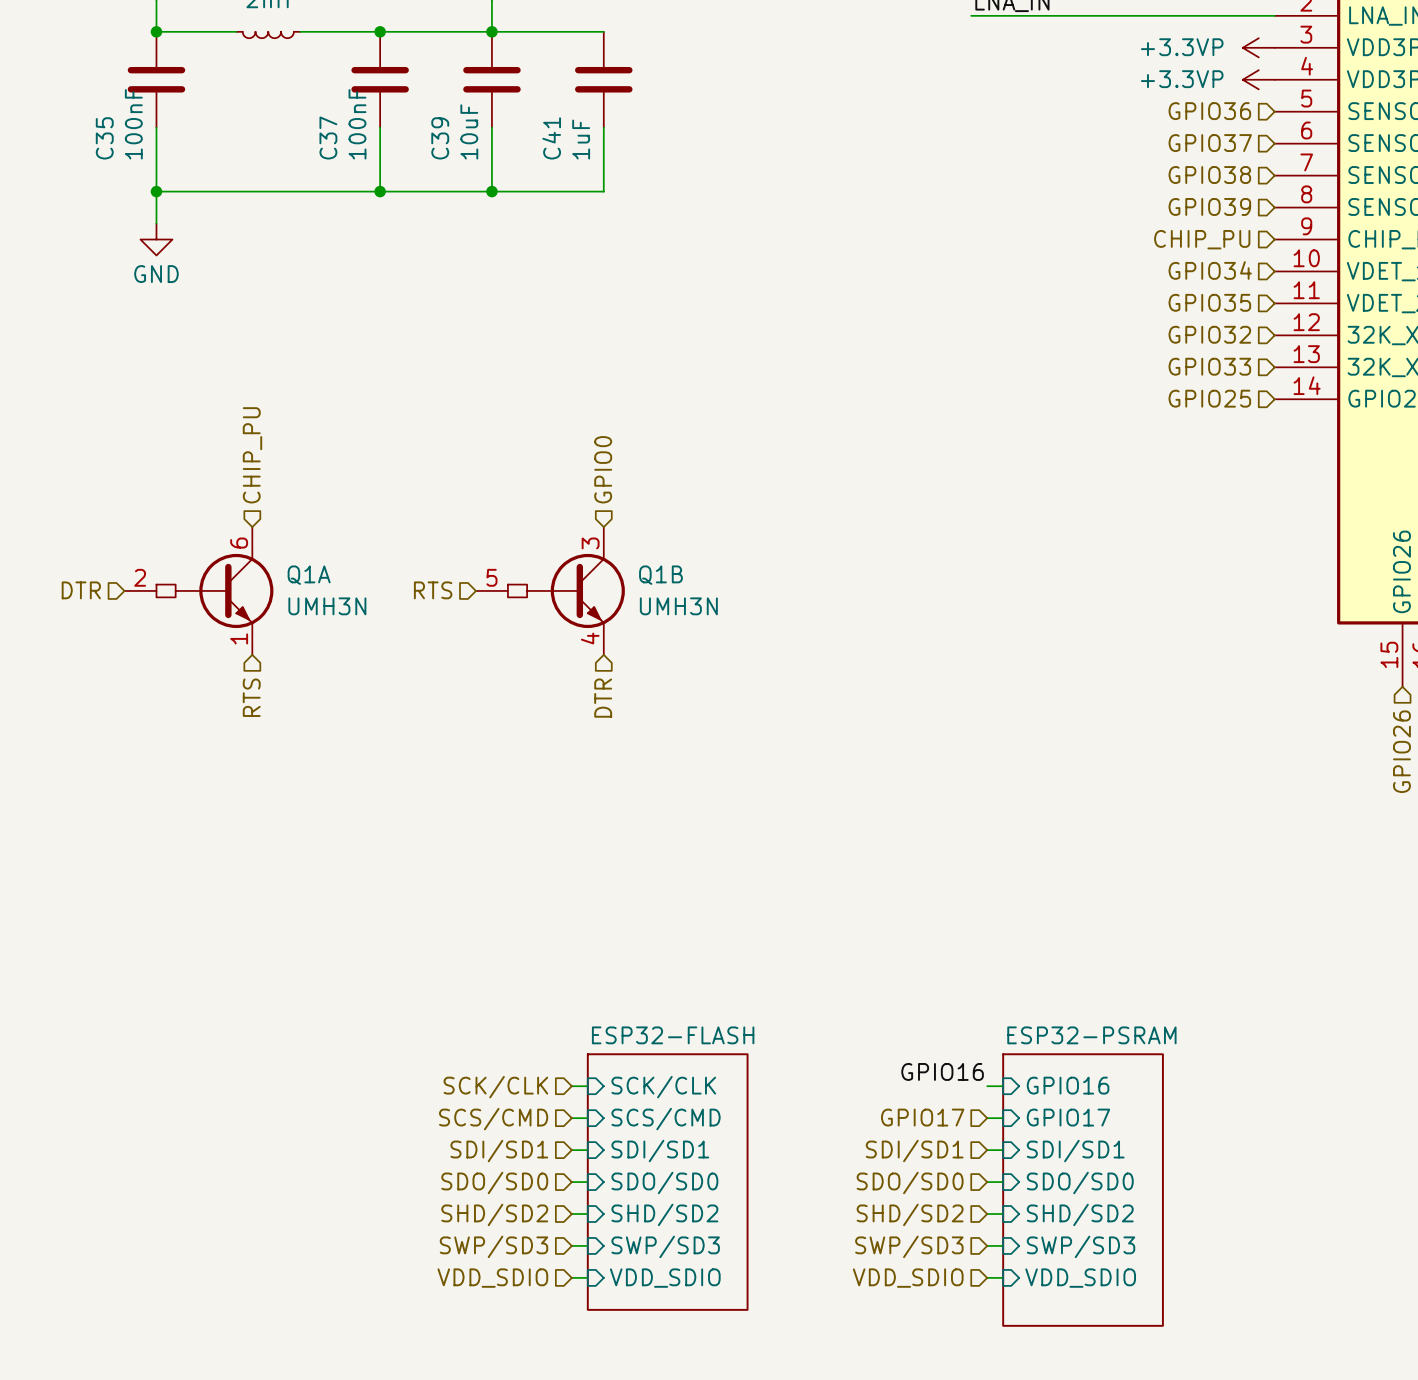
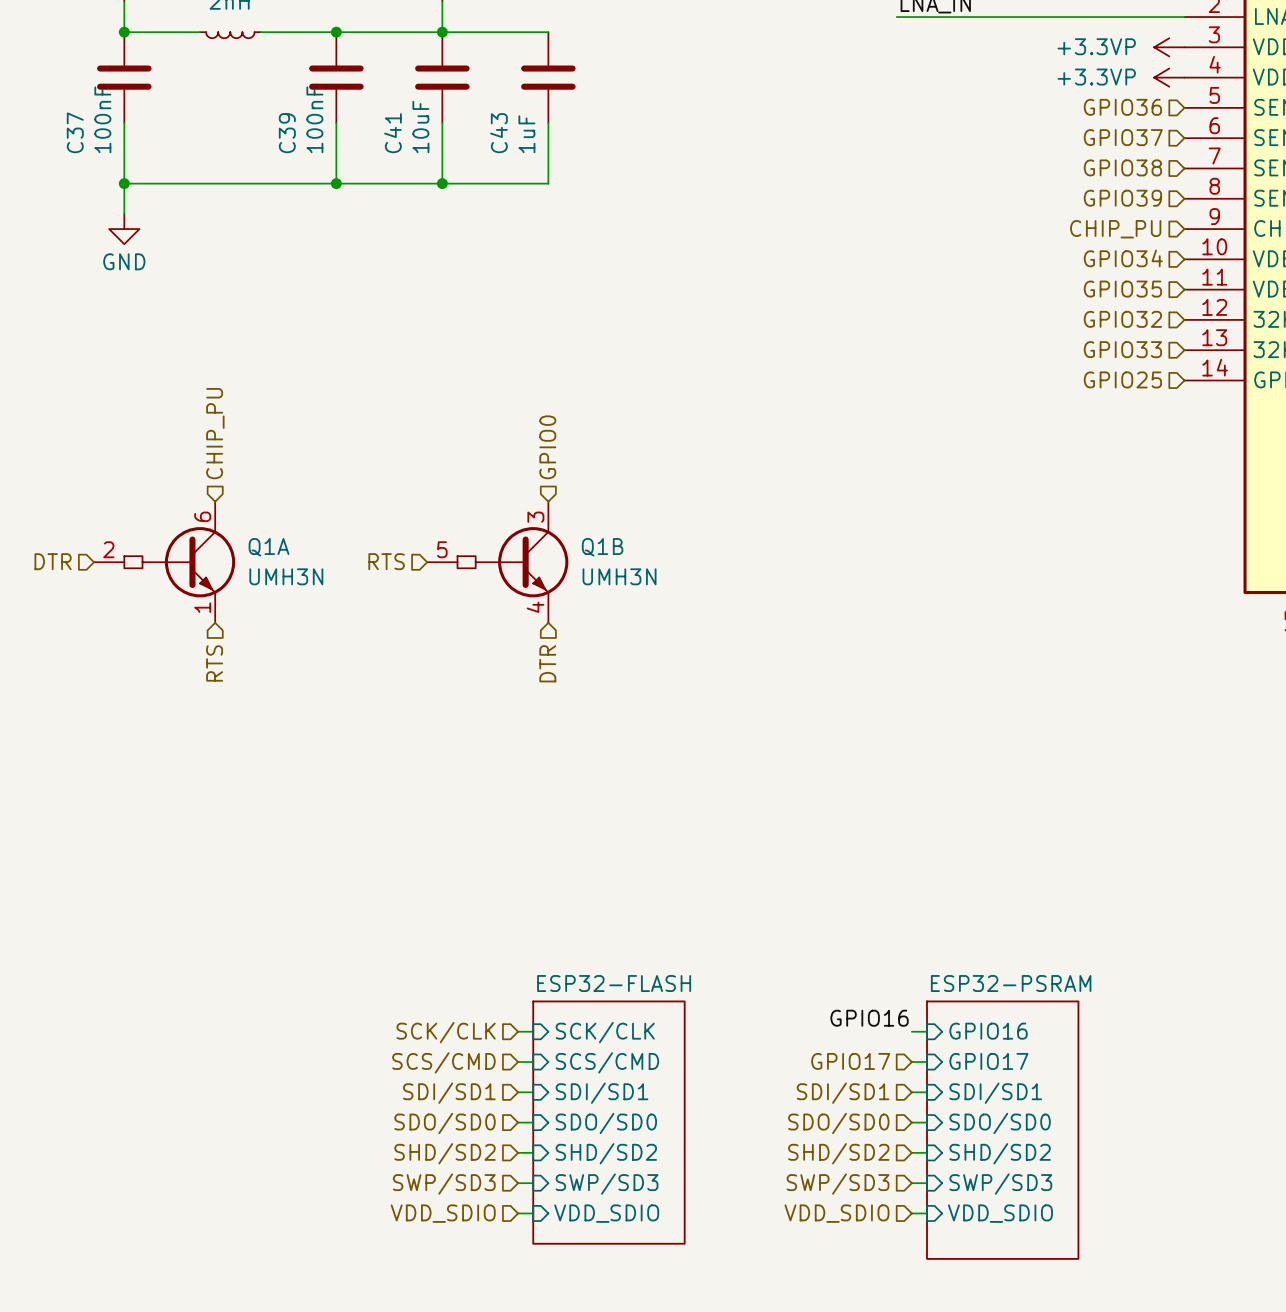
C37 name: C37 (328, 137) -> C39 (287, 133)
C35 name: C35 (104, 138) -> C37 (75, 132)
C39 name: C39 (440, 138) -> C41 (392, 133)
C41 name: C41 (551, 138) -> C43 (498, 133)

